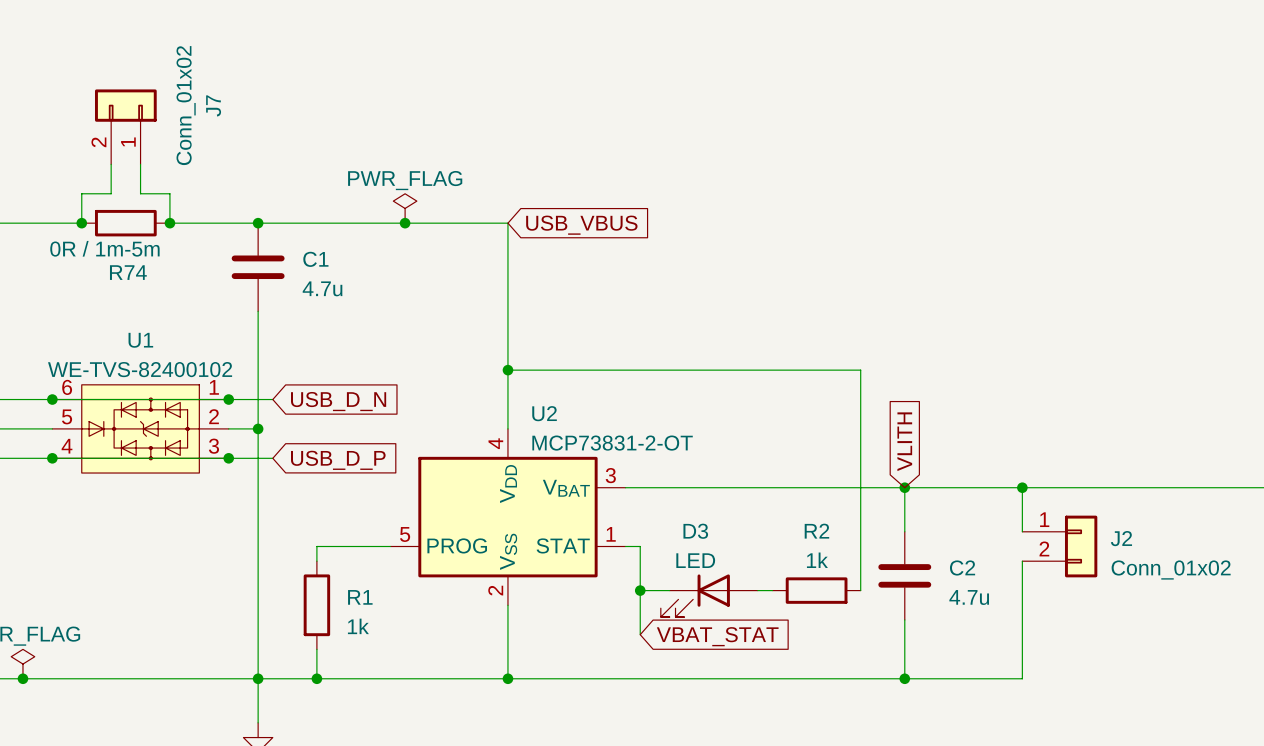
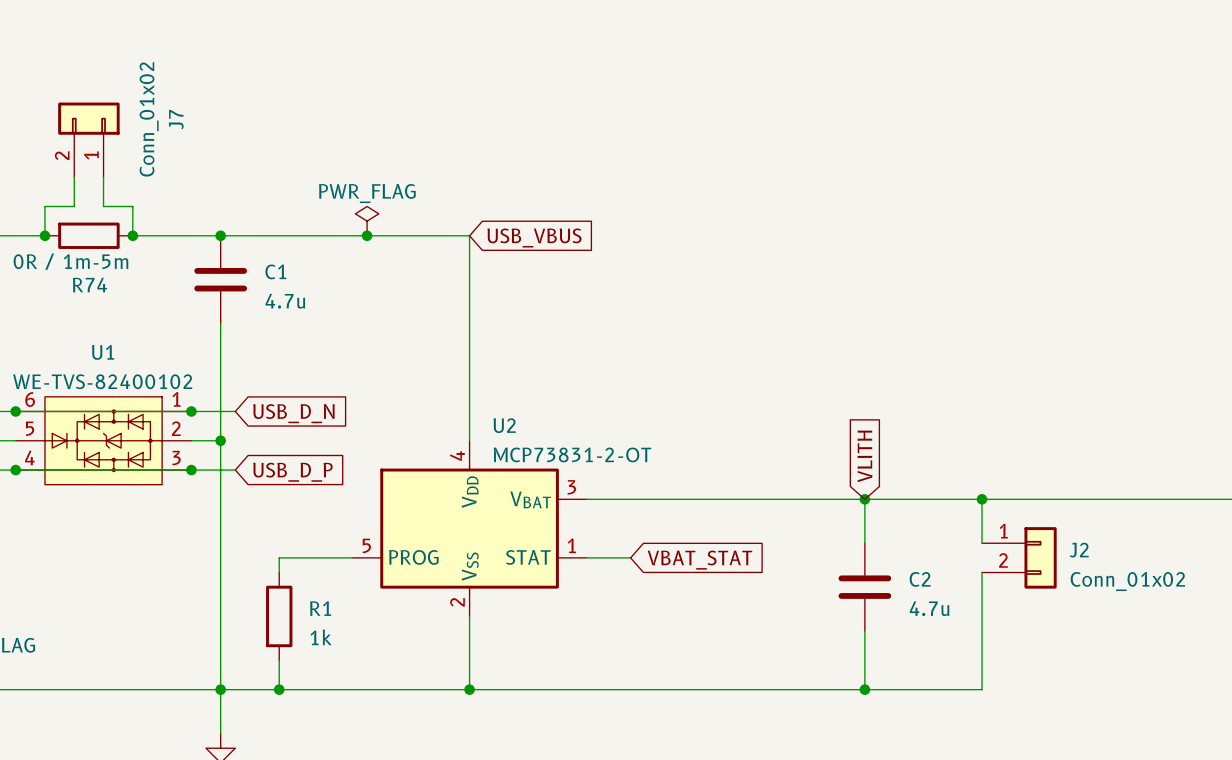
wire: (507, 370) (860, 370) (860, 590) -> none
junction: (507, 370) -> none
wire: (640, 546) (640, 634) -> (601, 557) (630, 557)
wire: (640, 590) (669, 590) -> none
junction: (640, 590) -> none
wire: (757, 590) (772, 590) -> none
R2: 1k (816, 590) -> none
D3: LED (709, 595) -> none
global label position: VBAT_STAT (717, 636) -> VBAT_STAT (699, 560)

